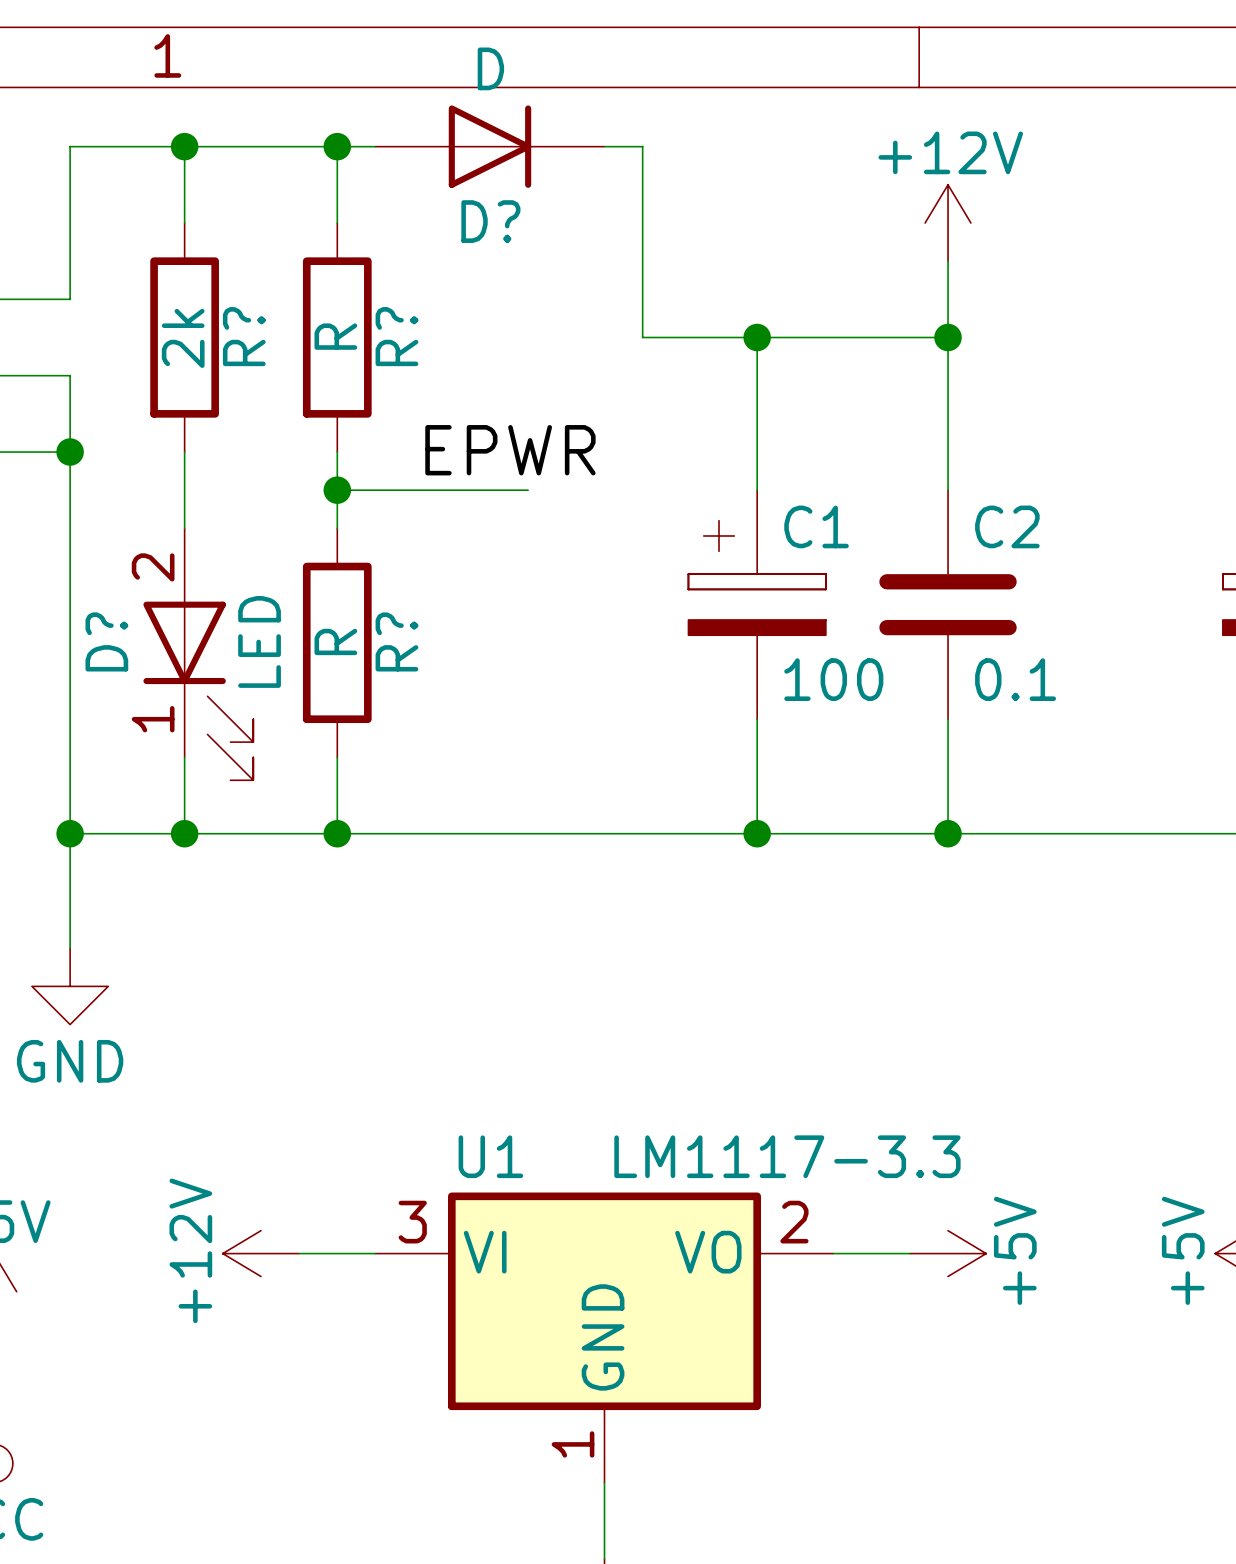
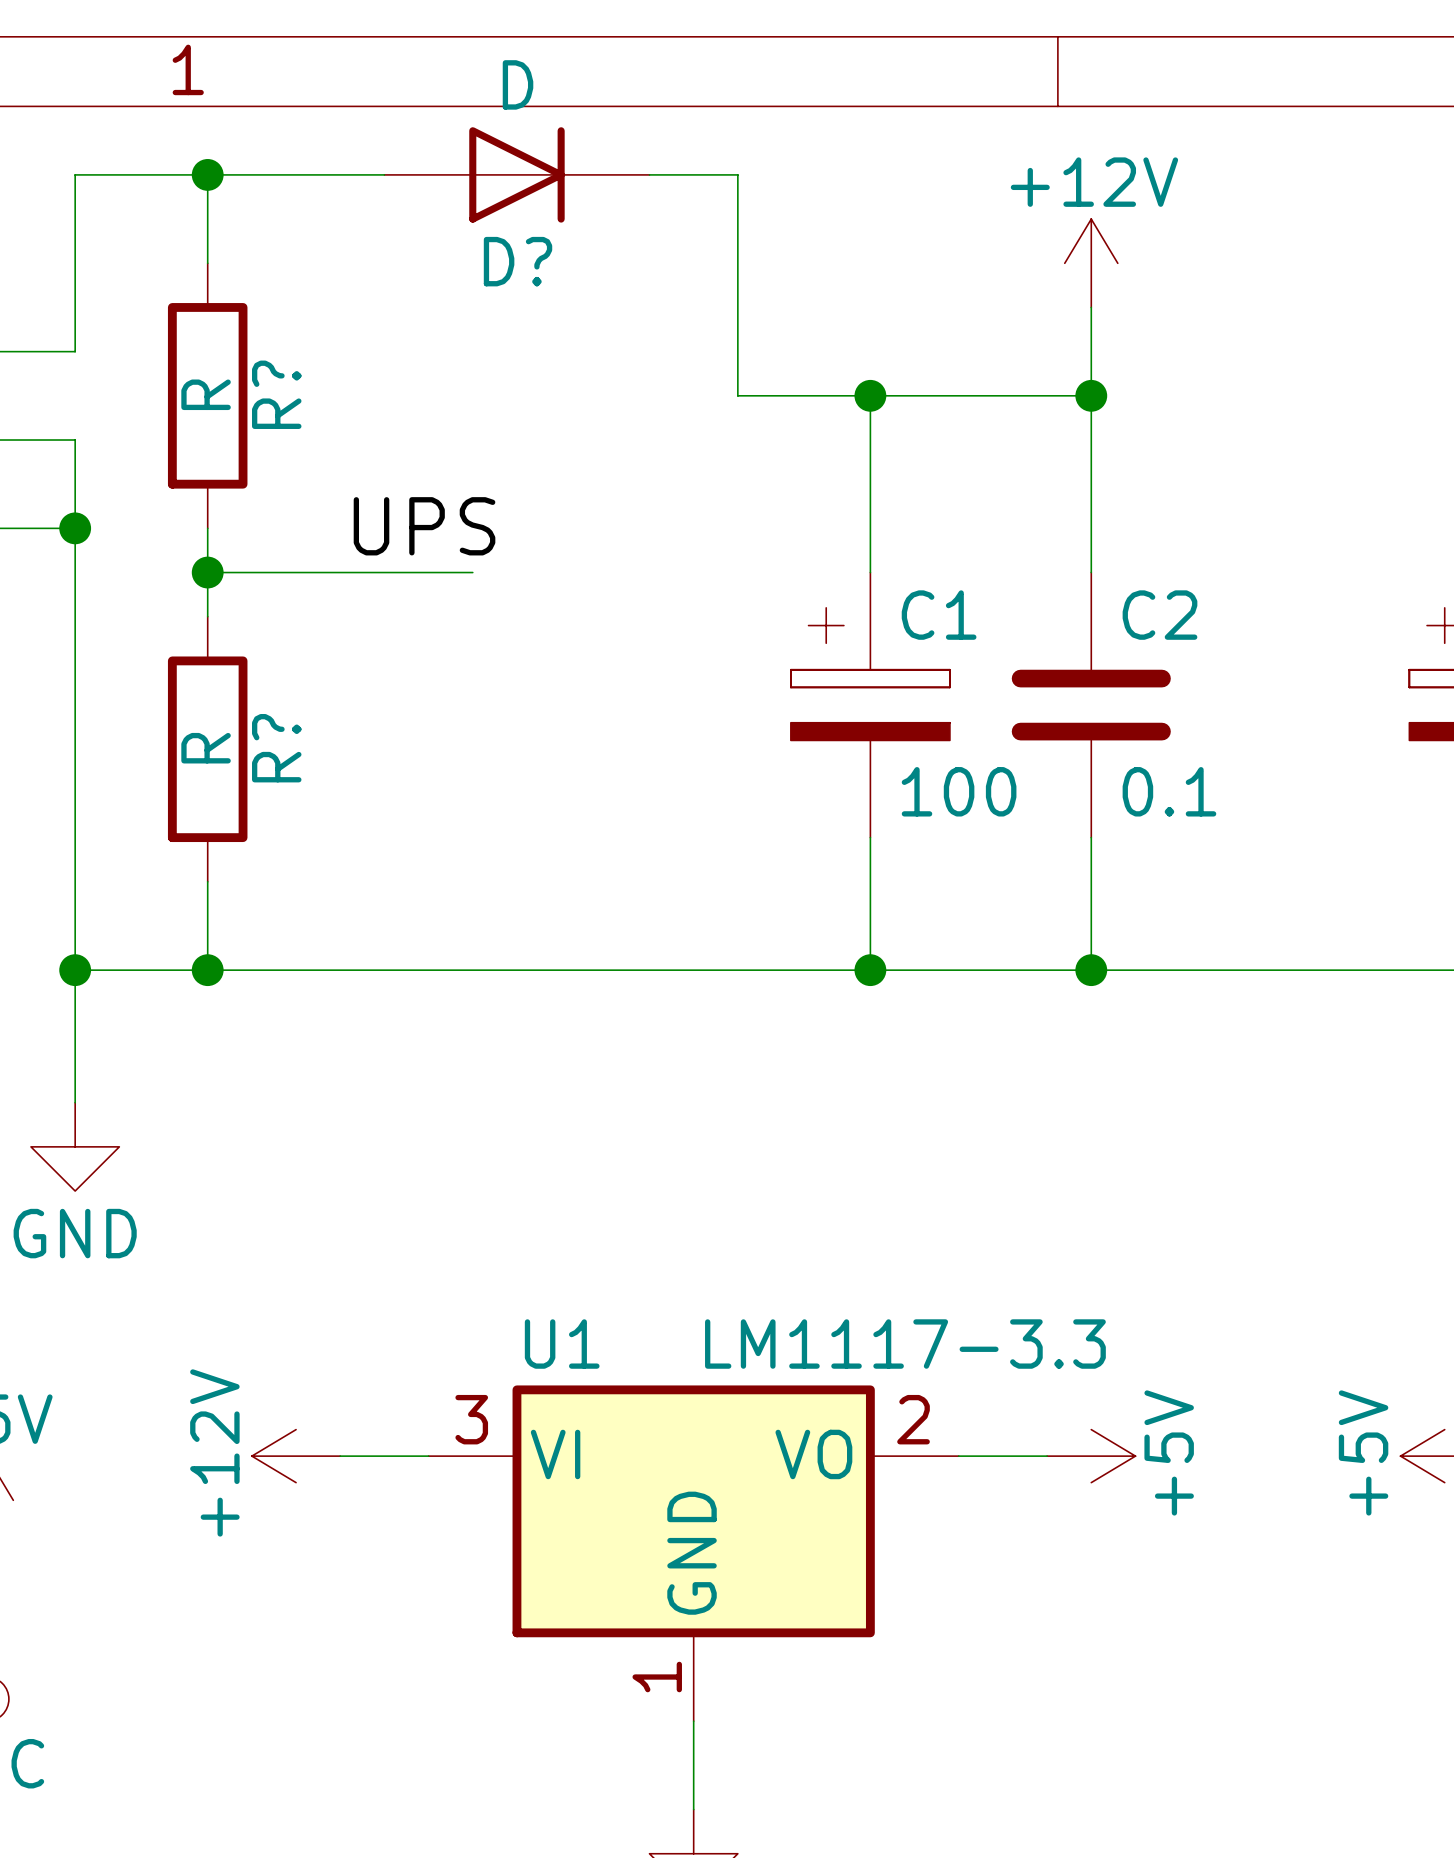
junction: (337, 146) -> none
wire: (375, 146) (337, 146) (337, 223) -> none
D? position: (489, 146) -> (516, 174)
R?: R (337, 337) -> none
R? value: 2k (183, 338) -> R (206, 394)
label: none -> UPS (424, 526)
label: EPWR (510, 450) -> none
wire: (337, 452) (337, 528) -> none
wire: none -> (207, 572) (384, 572)
junction position: (337, 490) -> (207, 572)
wire: (413, 490) (528, 490) -> none
R? position: (337, 642) -> (207, 749)
D?: LED (198, 654) -> none
wire: (337, 757) (337, 833) -> none
junction: (337, 833) -> none

